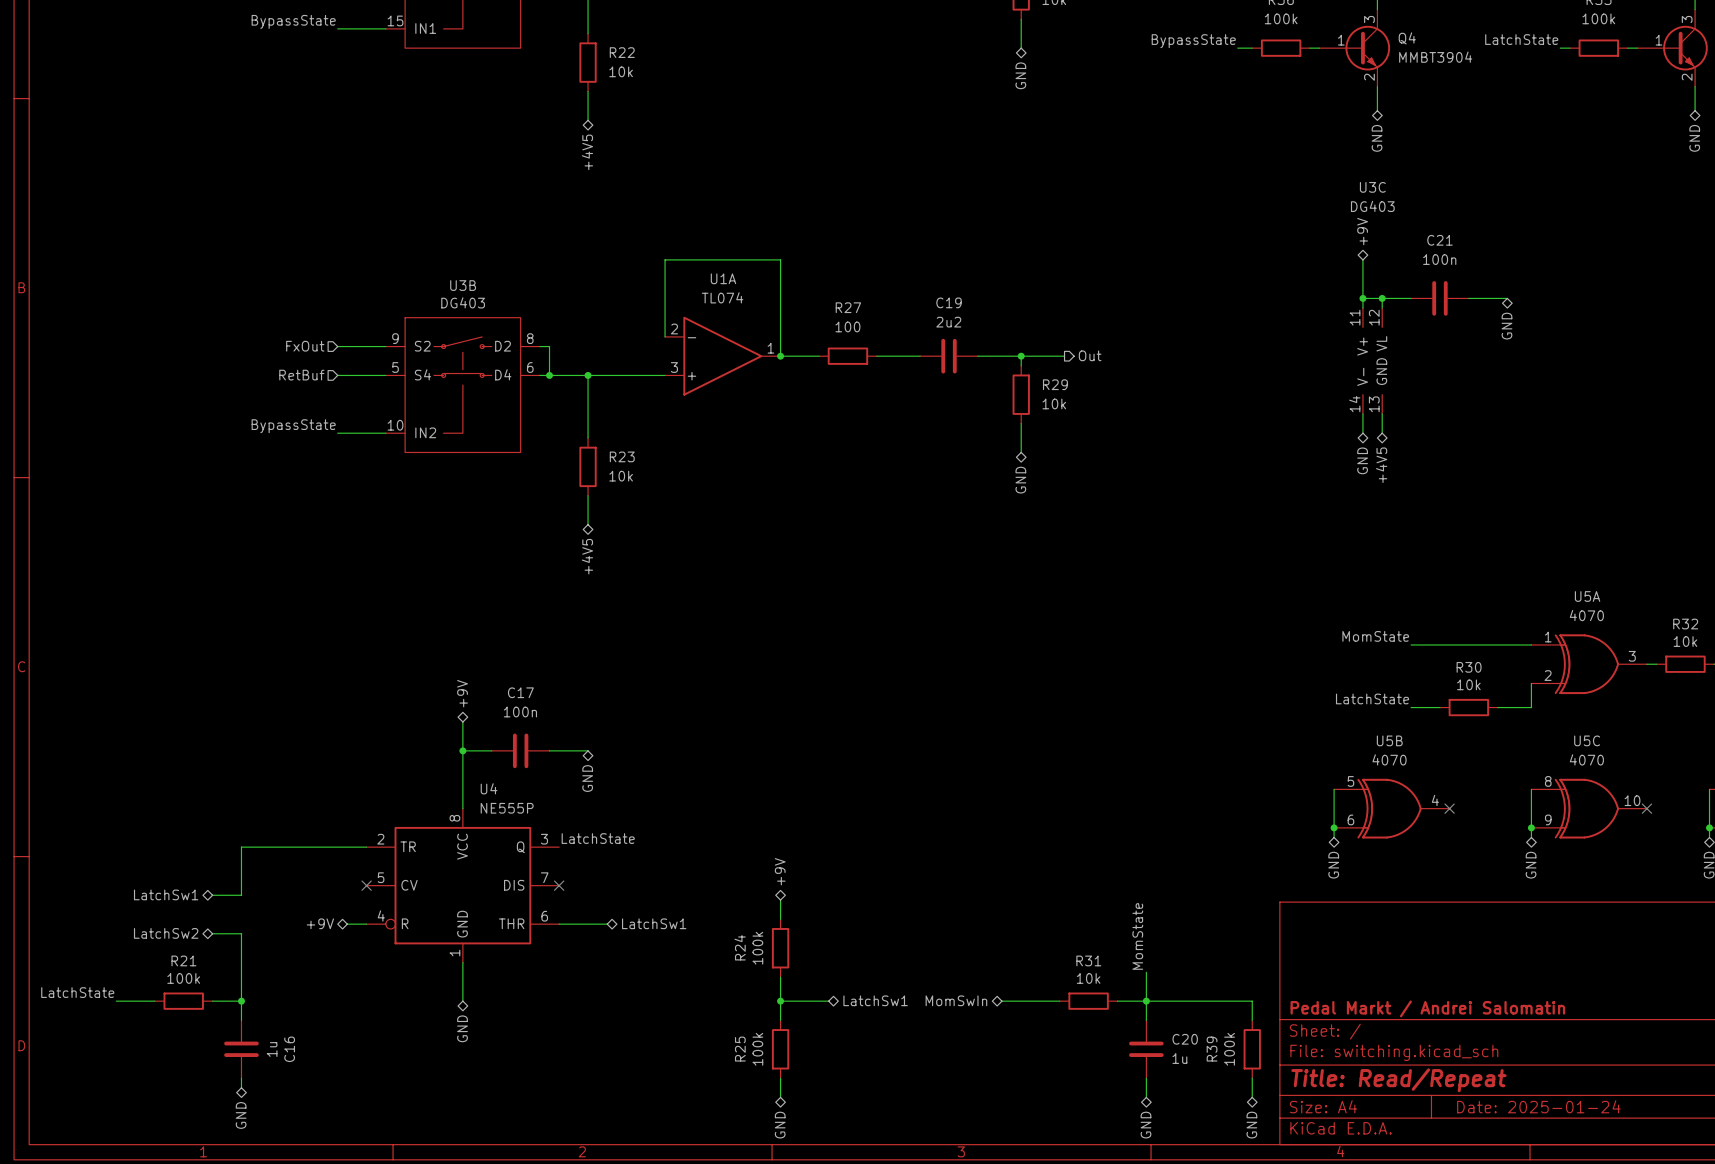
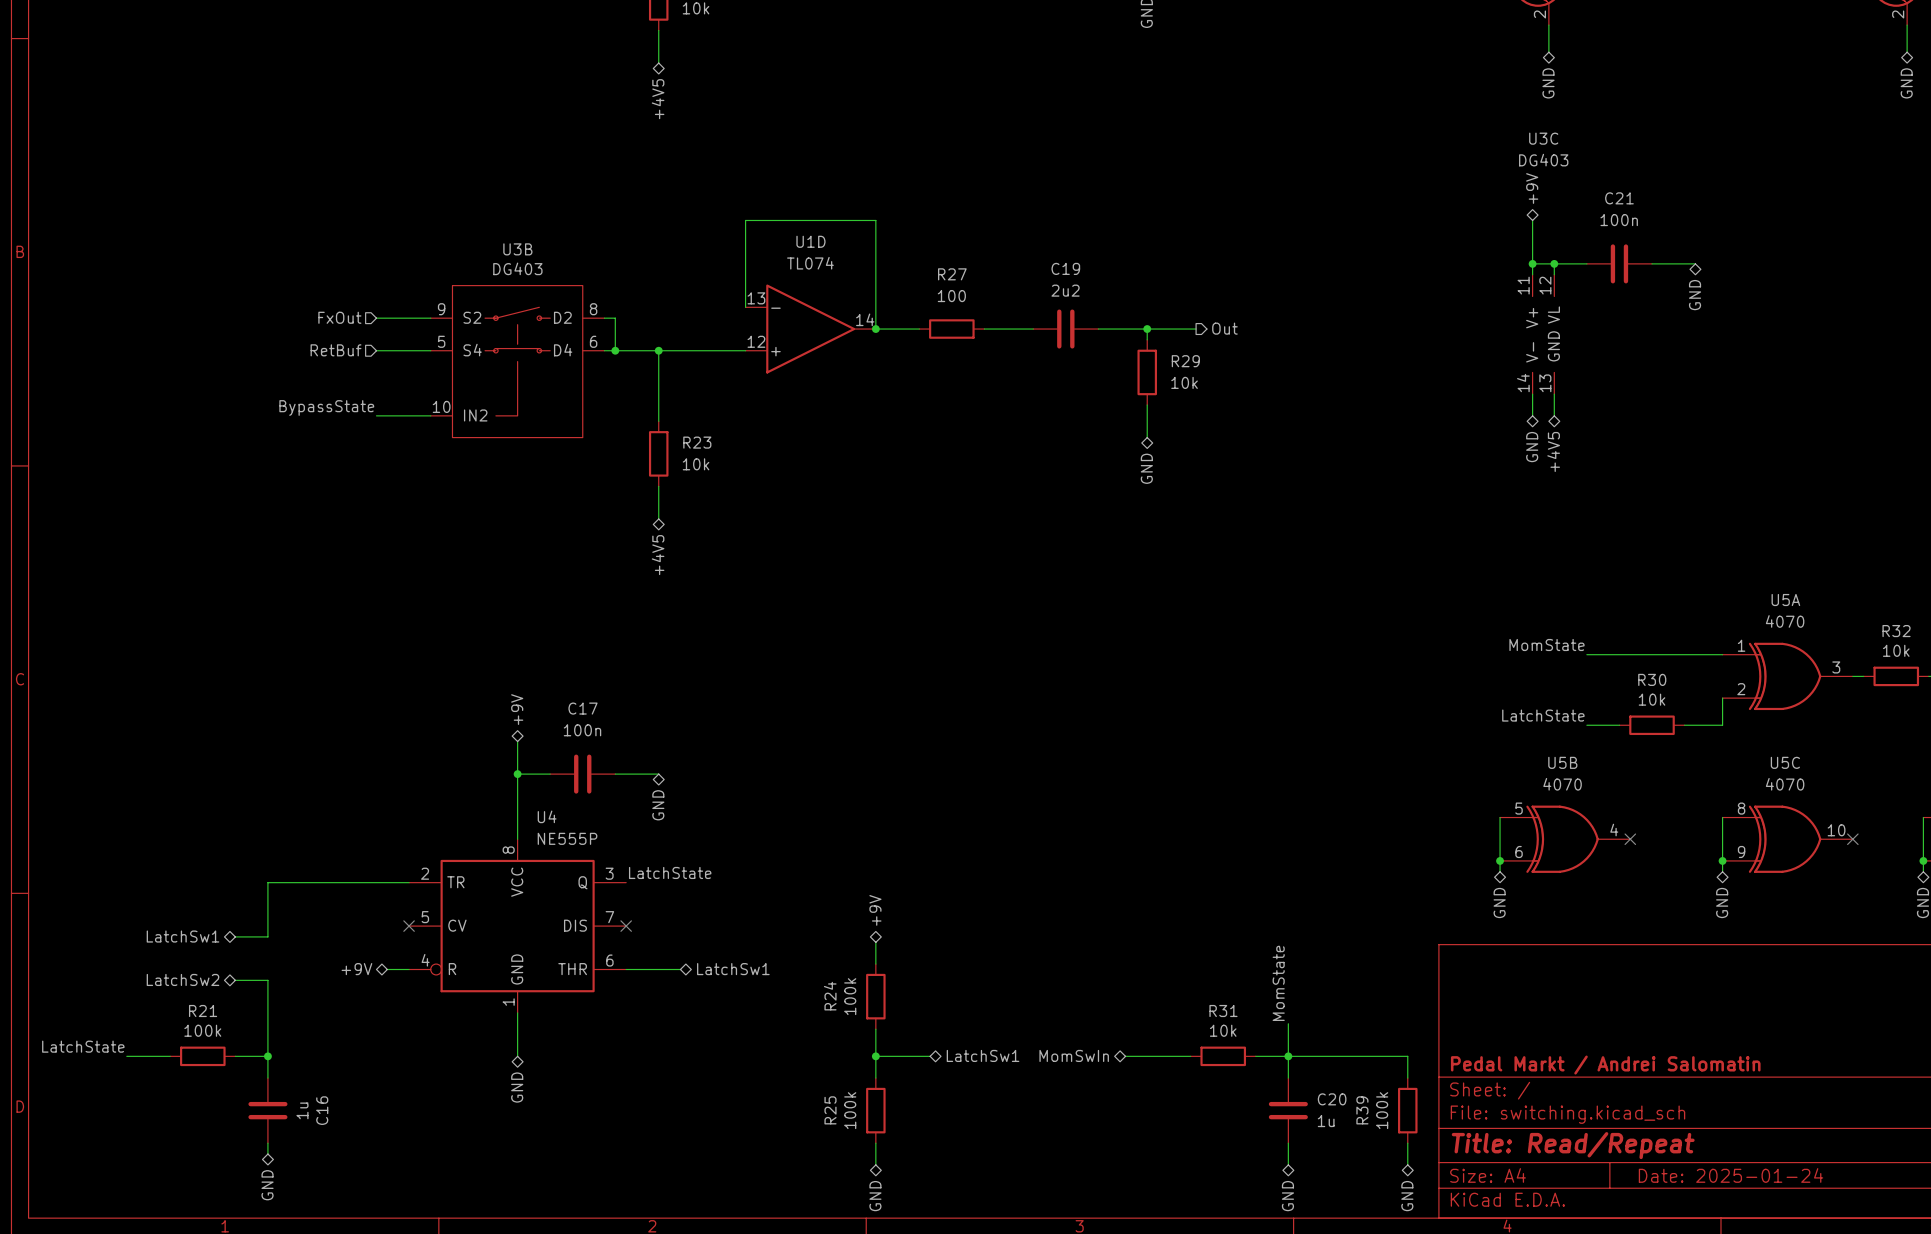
U1A name: U1A (723, 278) -> U1D (810, 241)
U1A pin number: 2 (674, 328) -> 13 (756, 298)
U1A pin number: 1 (770, 348) -> 14 (865, 319)
U1A pin number: 3 (674, 367) -> 12 (756, 341)

